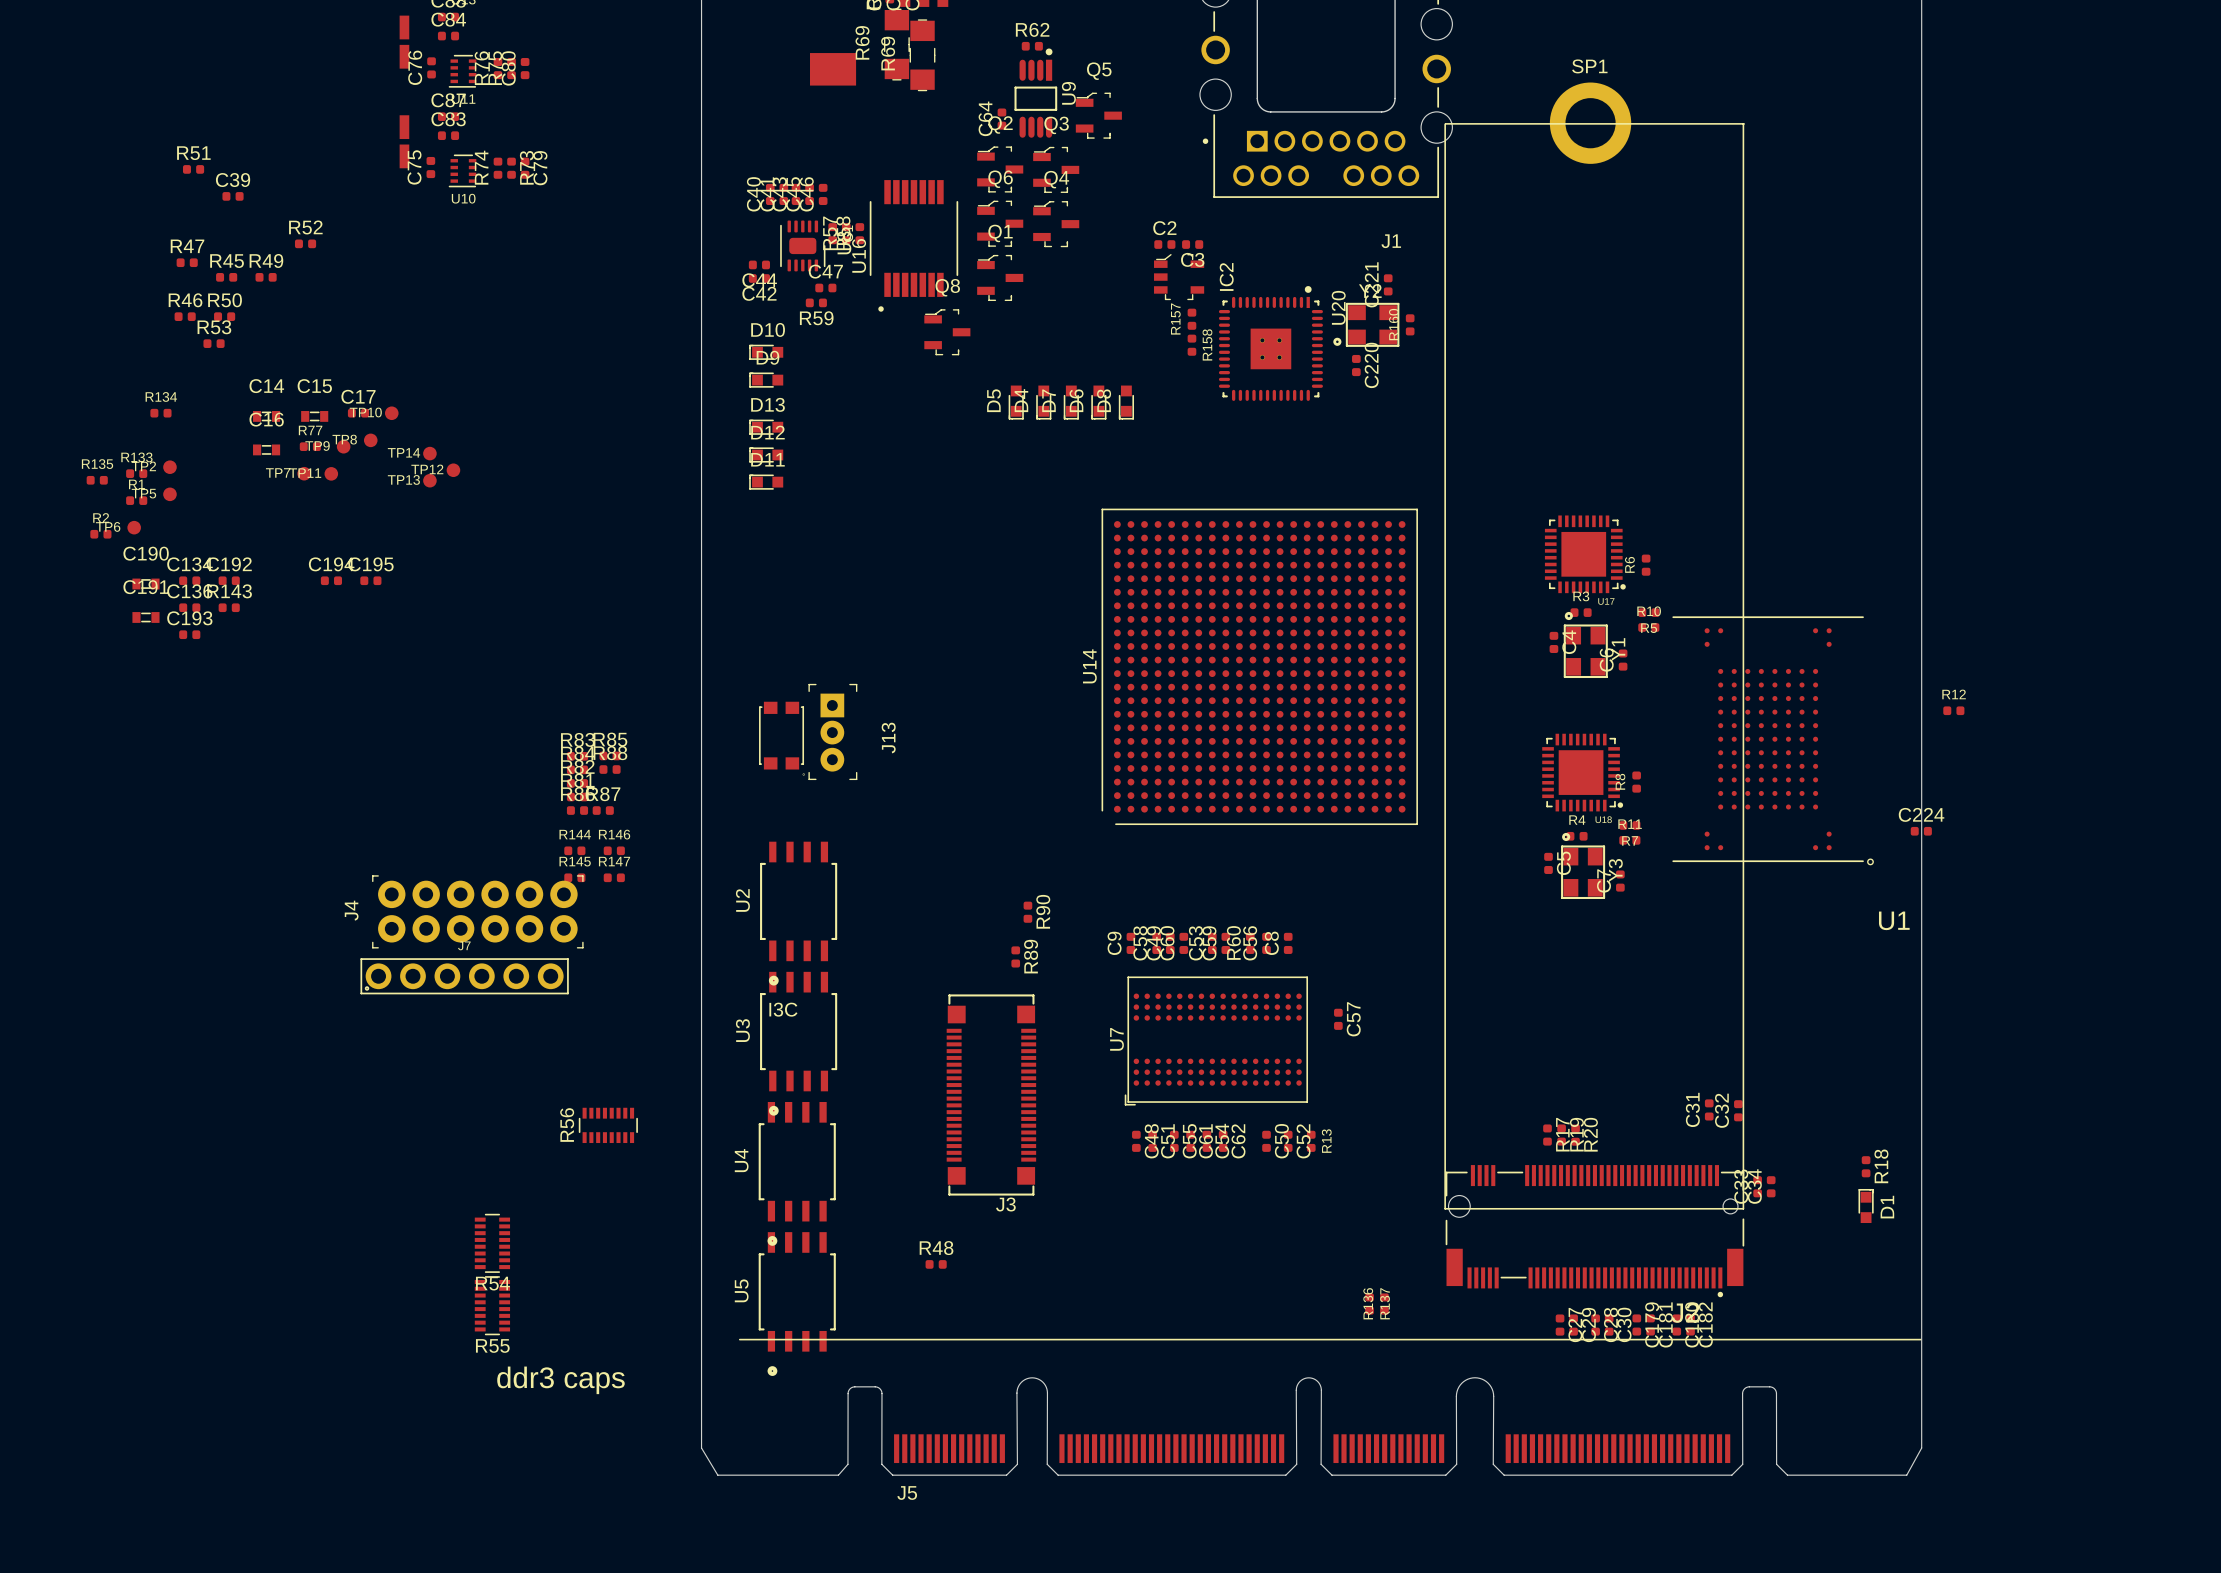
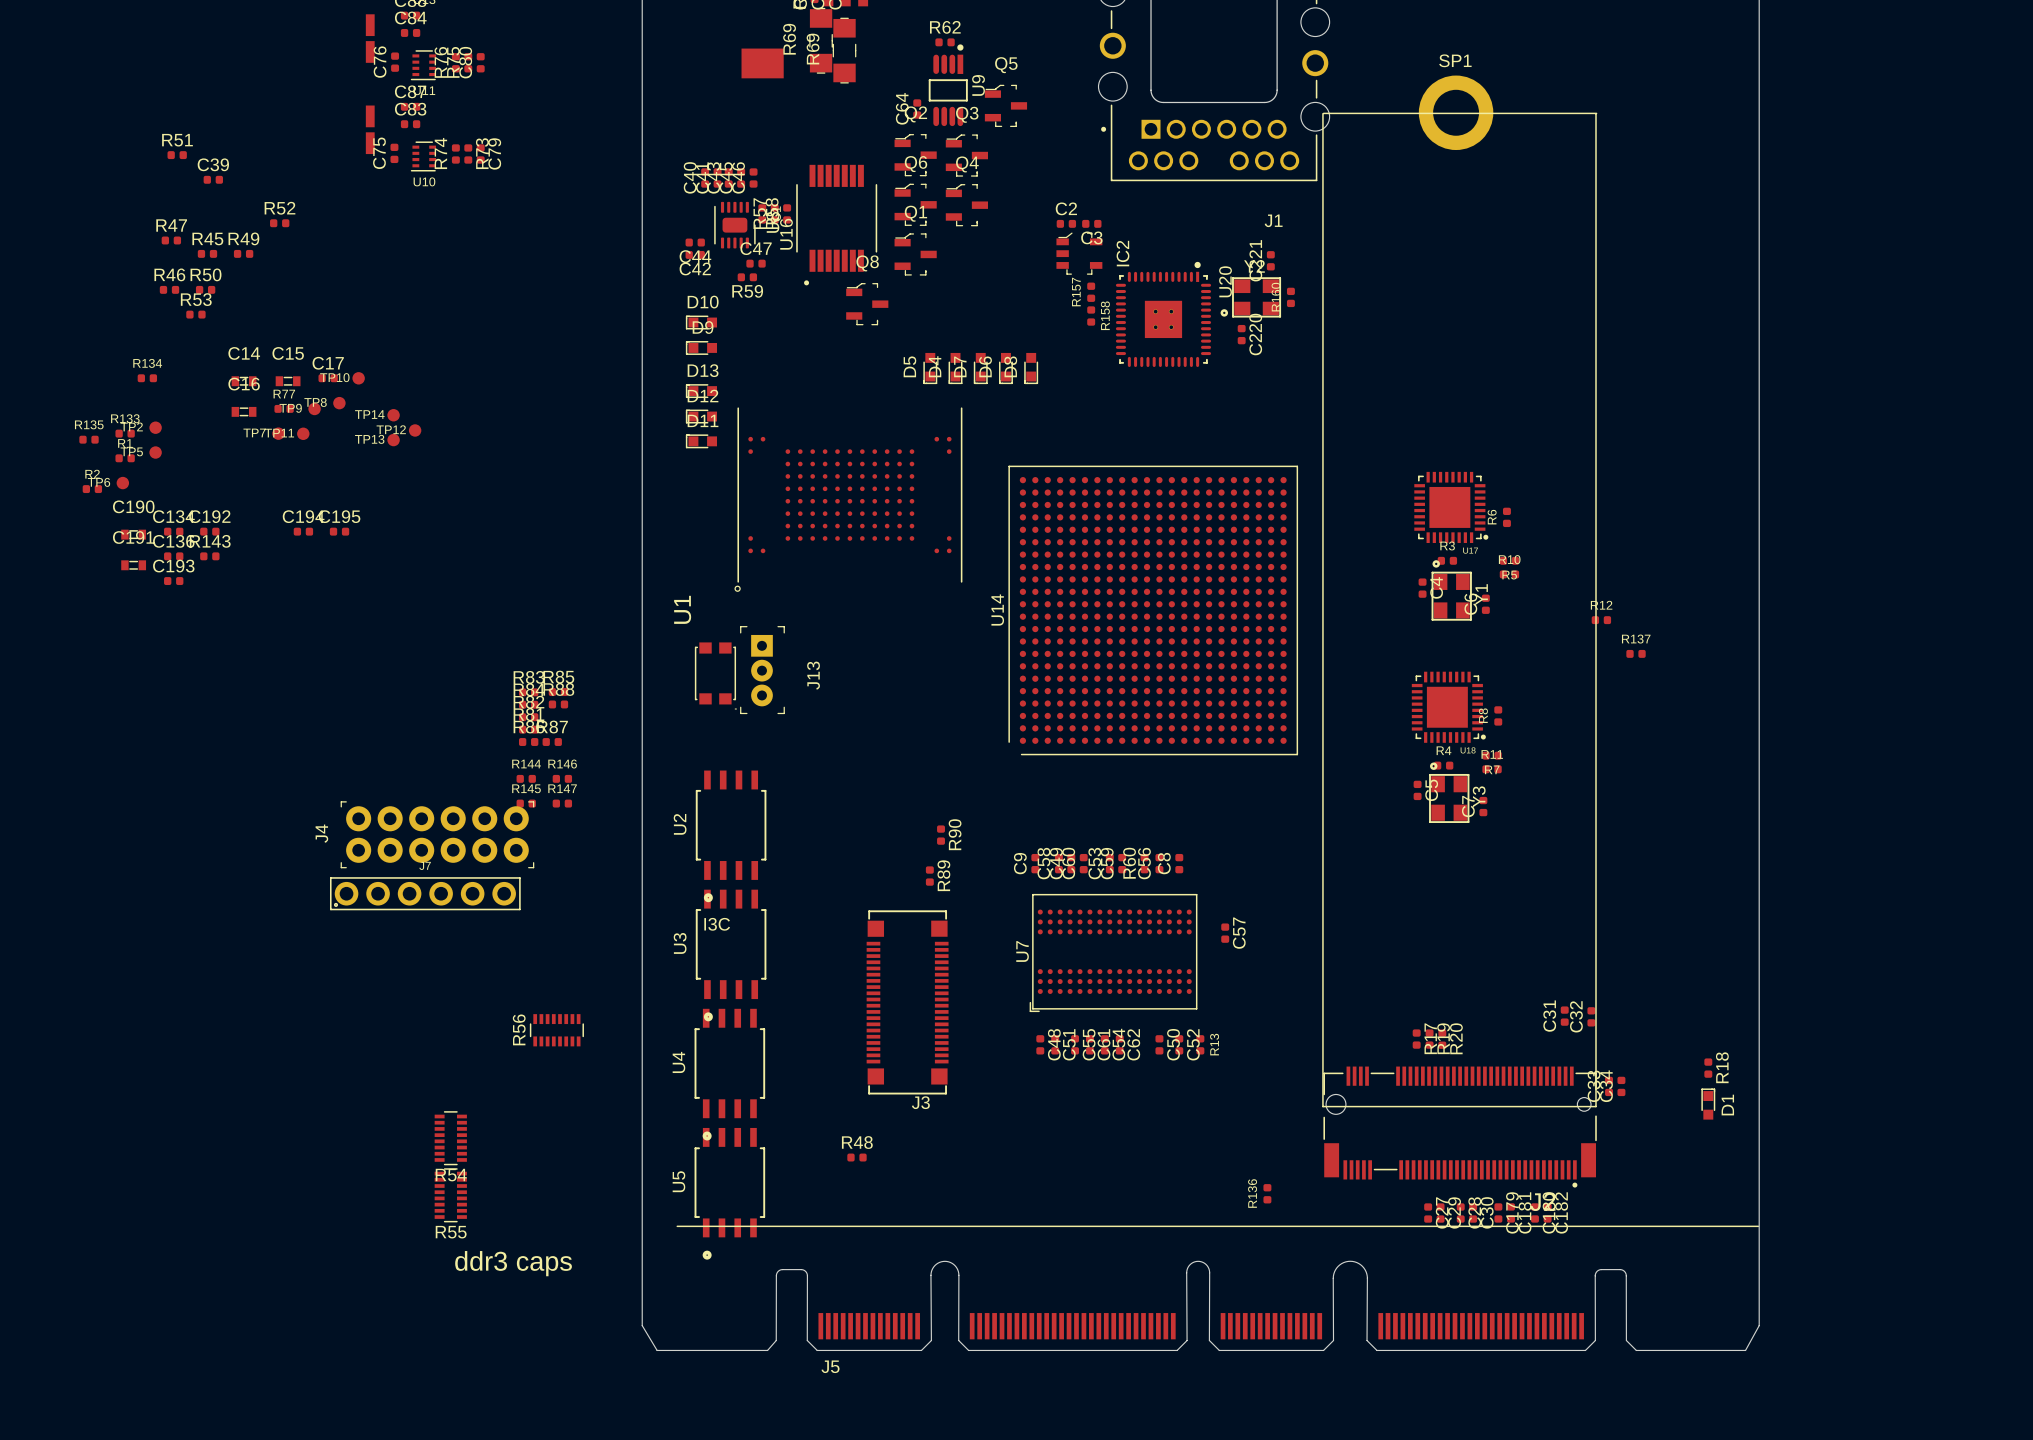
R12 position: (1953, 710) -> (1601, 620)
U1 rotation: 0° (1773, 740) -> 90° clockwise (848, 499)
U1 position: (1773, 740) -> (848, 499)
C224: (1921, 831) -> none
R137 rotation: 0° (1369, 1304) -> 90° clockwise (1636, 653)
R137 position: (1369, 1304) -> (1636, 653)

